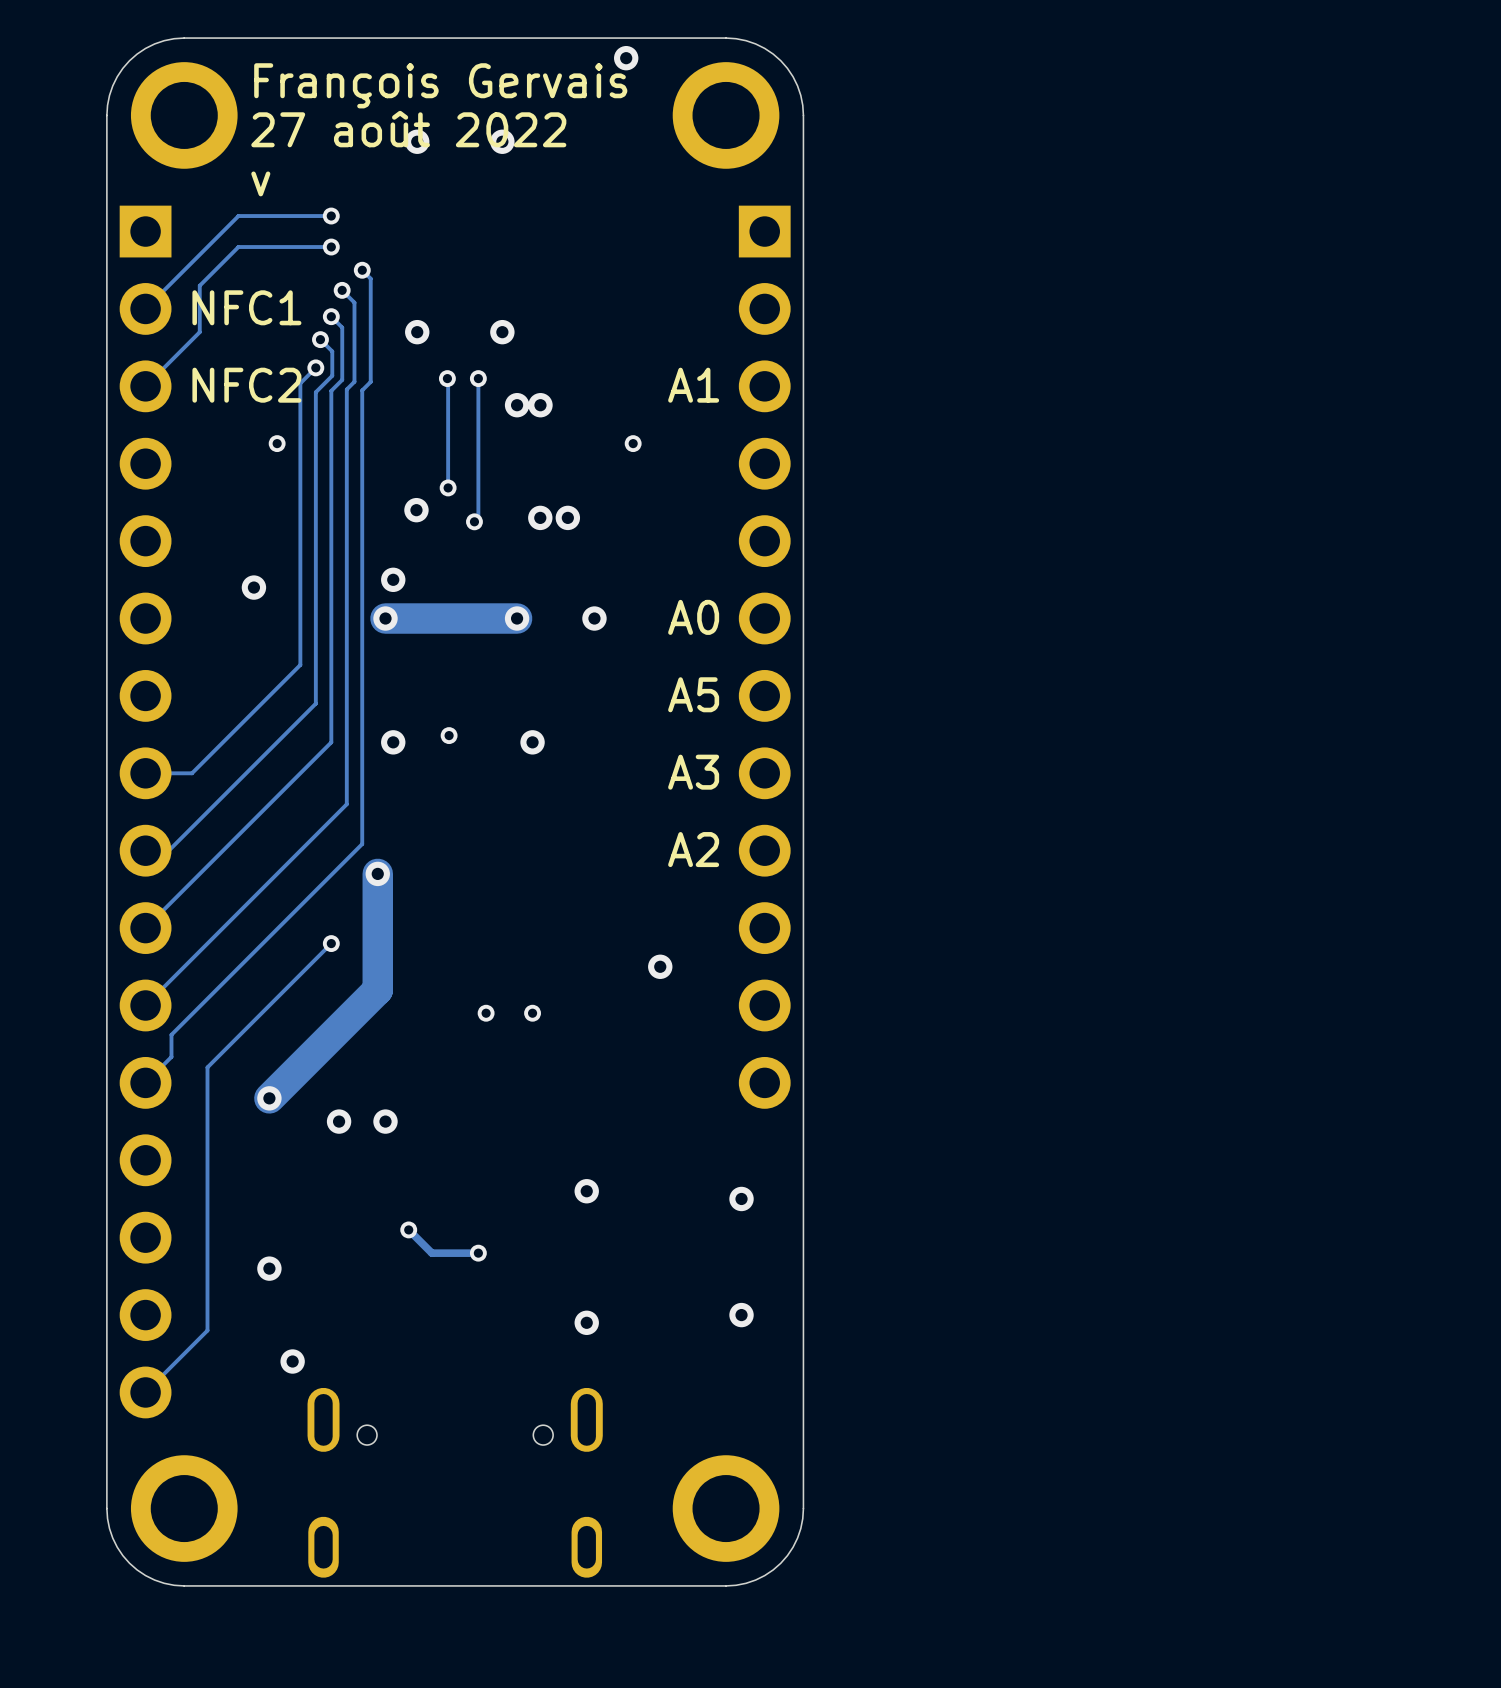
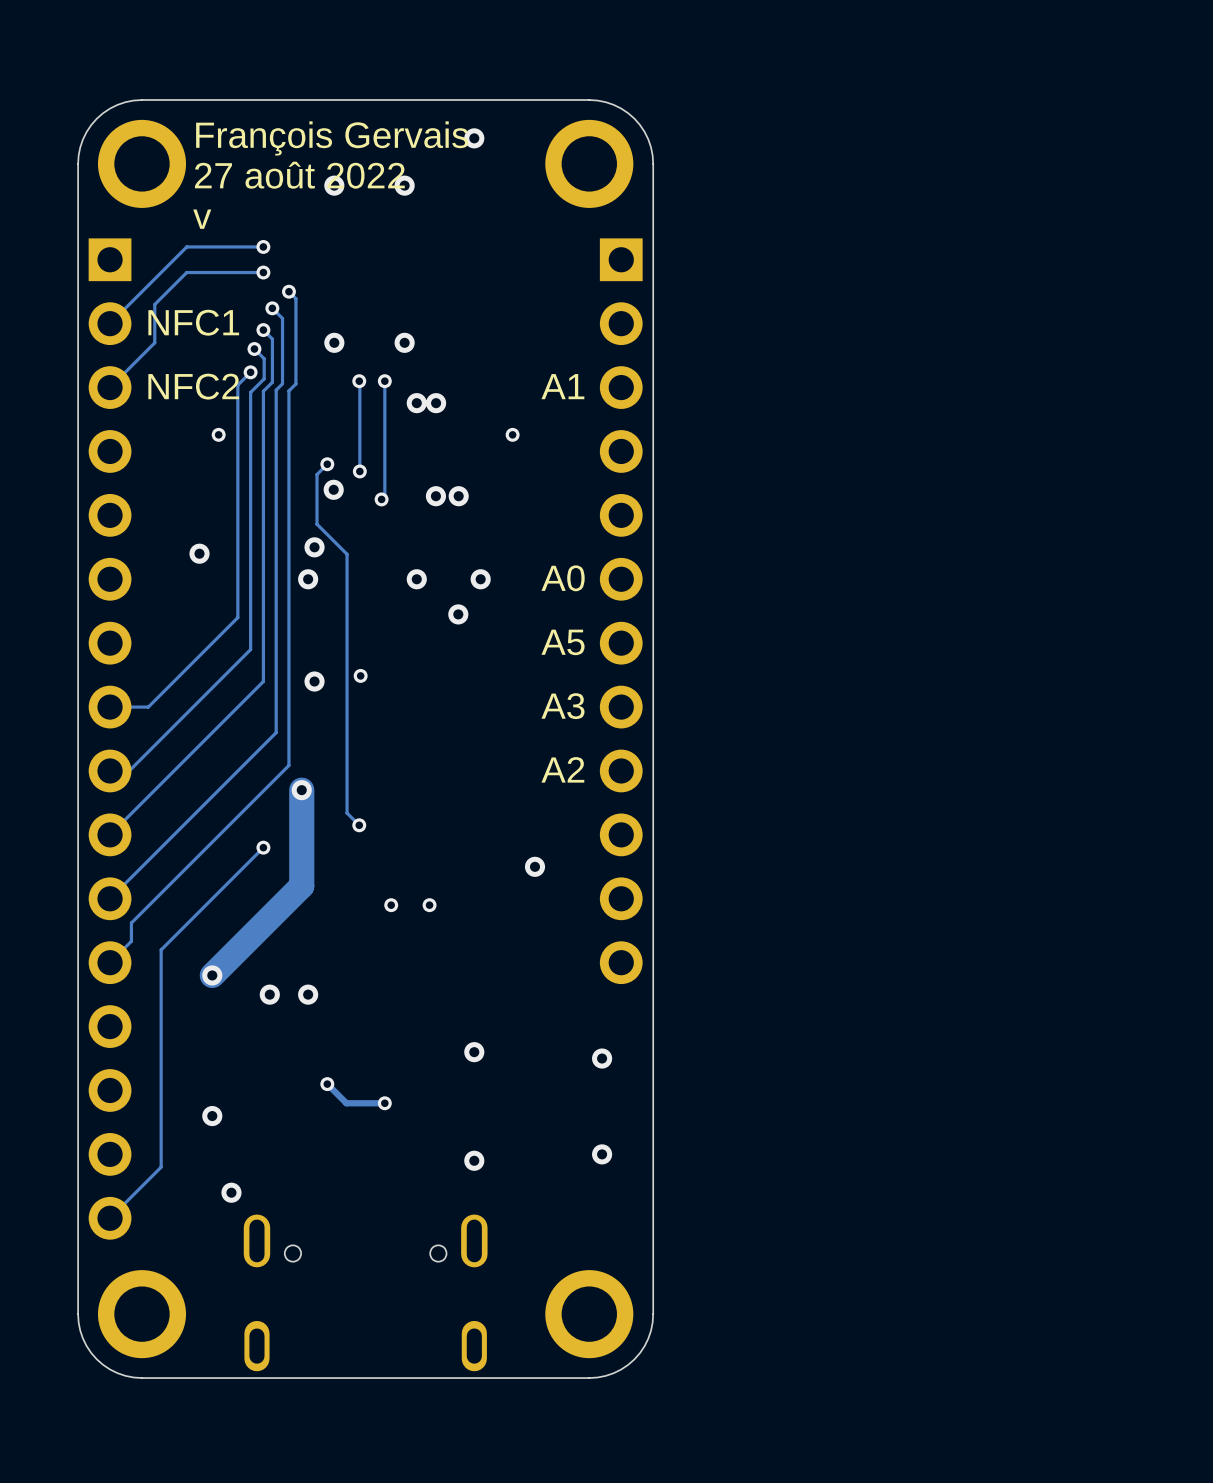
via position: (626, 58) -> (474, 138)
track: none -> (327, 464) (317, 474) (317, 524) (347, 554) (347, 813) (359, 825)
via: none -> (327, 464)
track: (517, 618) (385, 618) -> none
via position: (532, 742) -> (458, 614)
via: none -> (359, 825)

